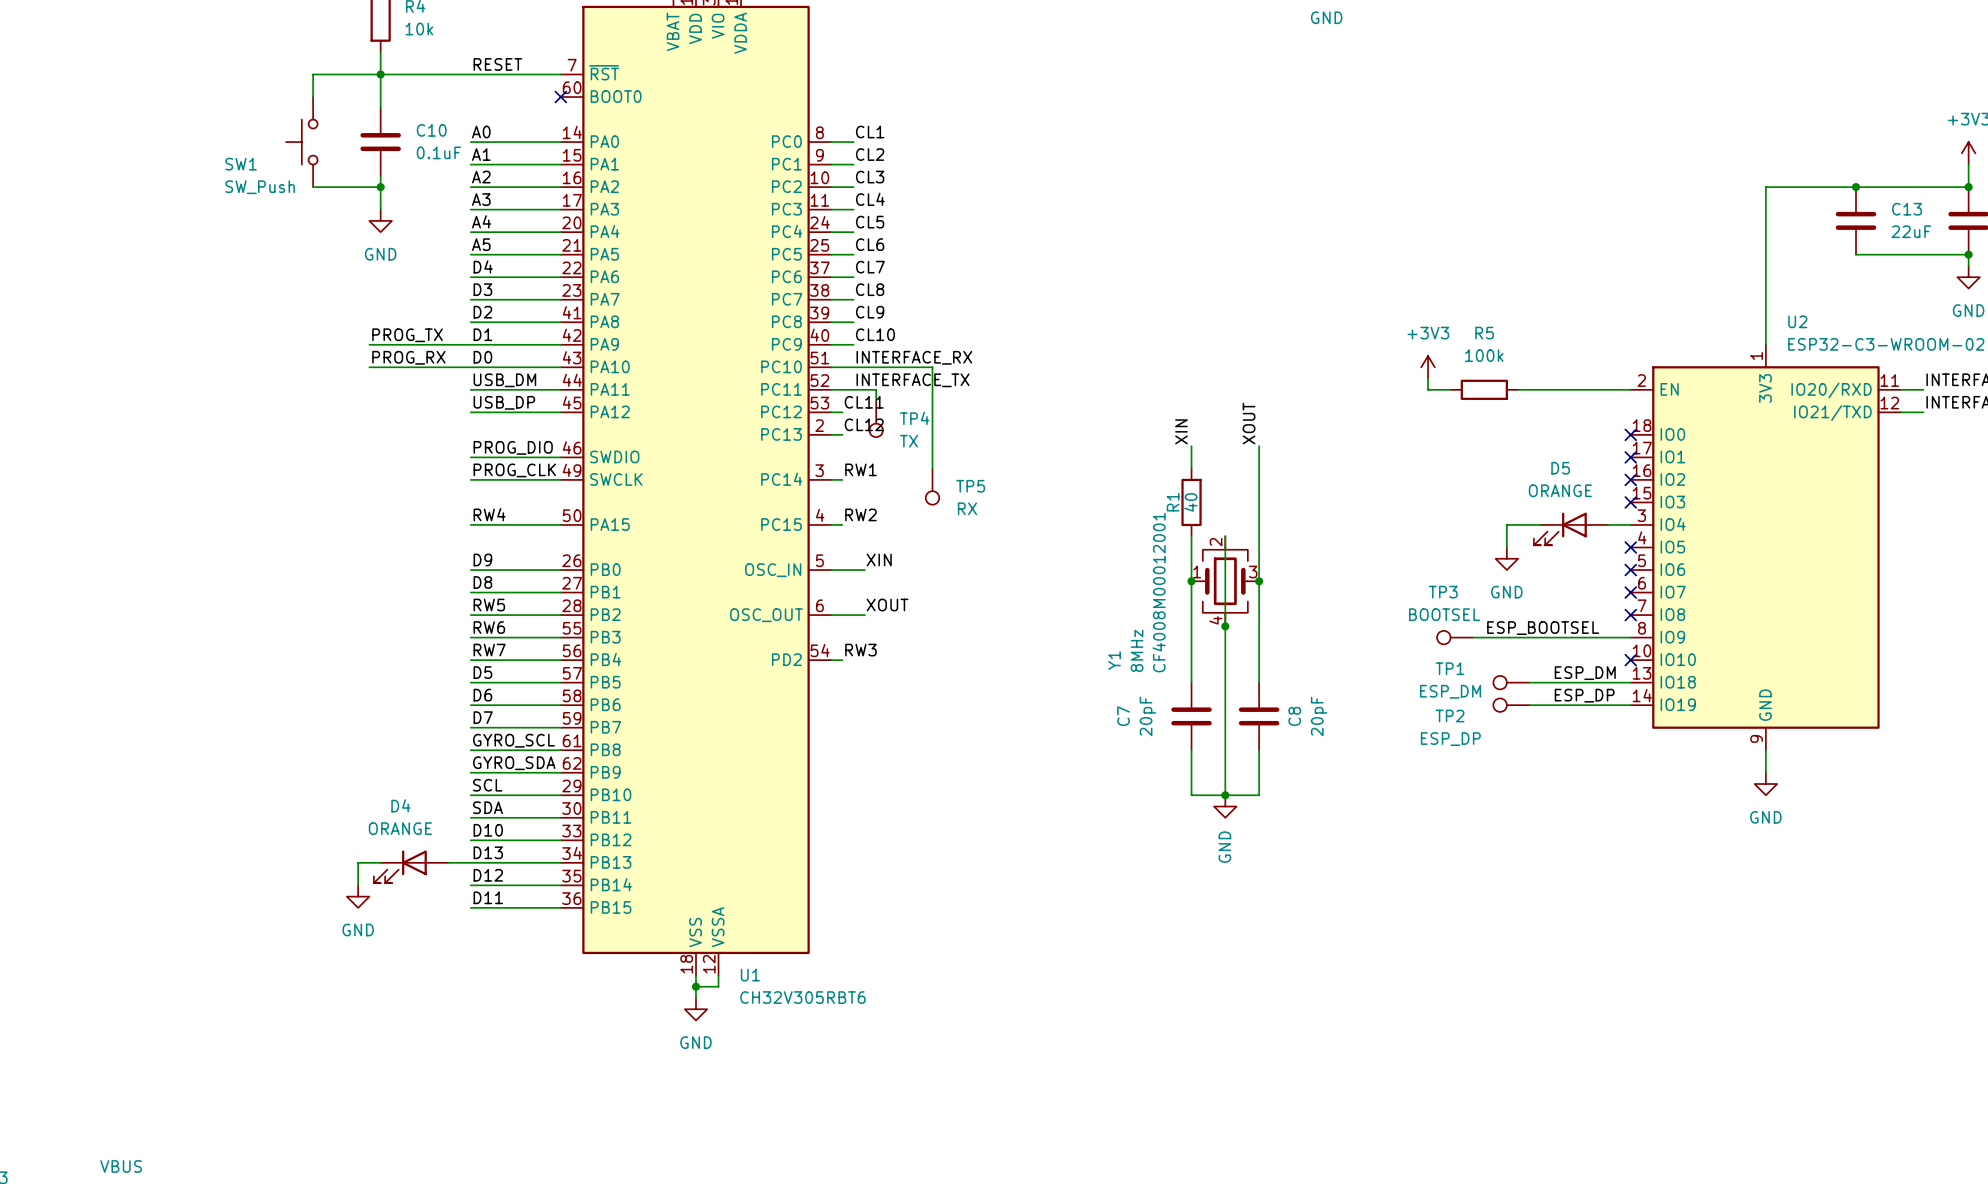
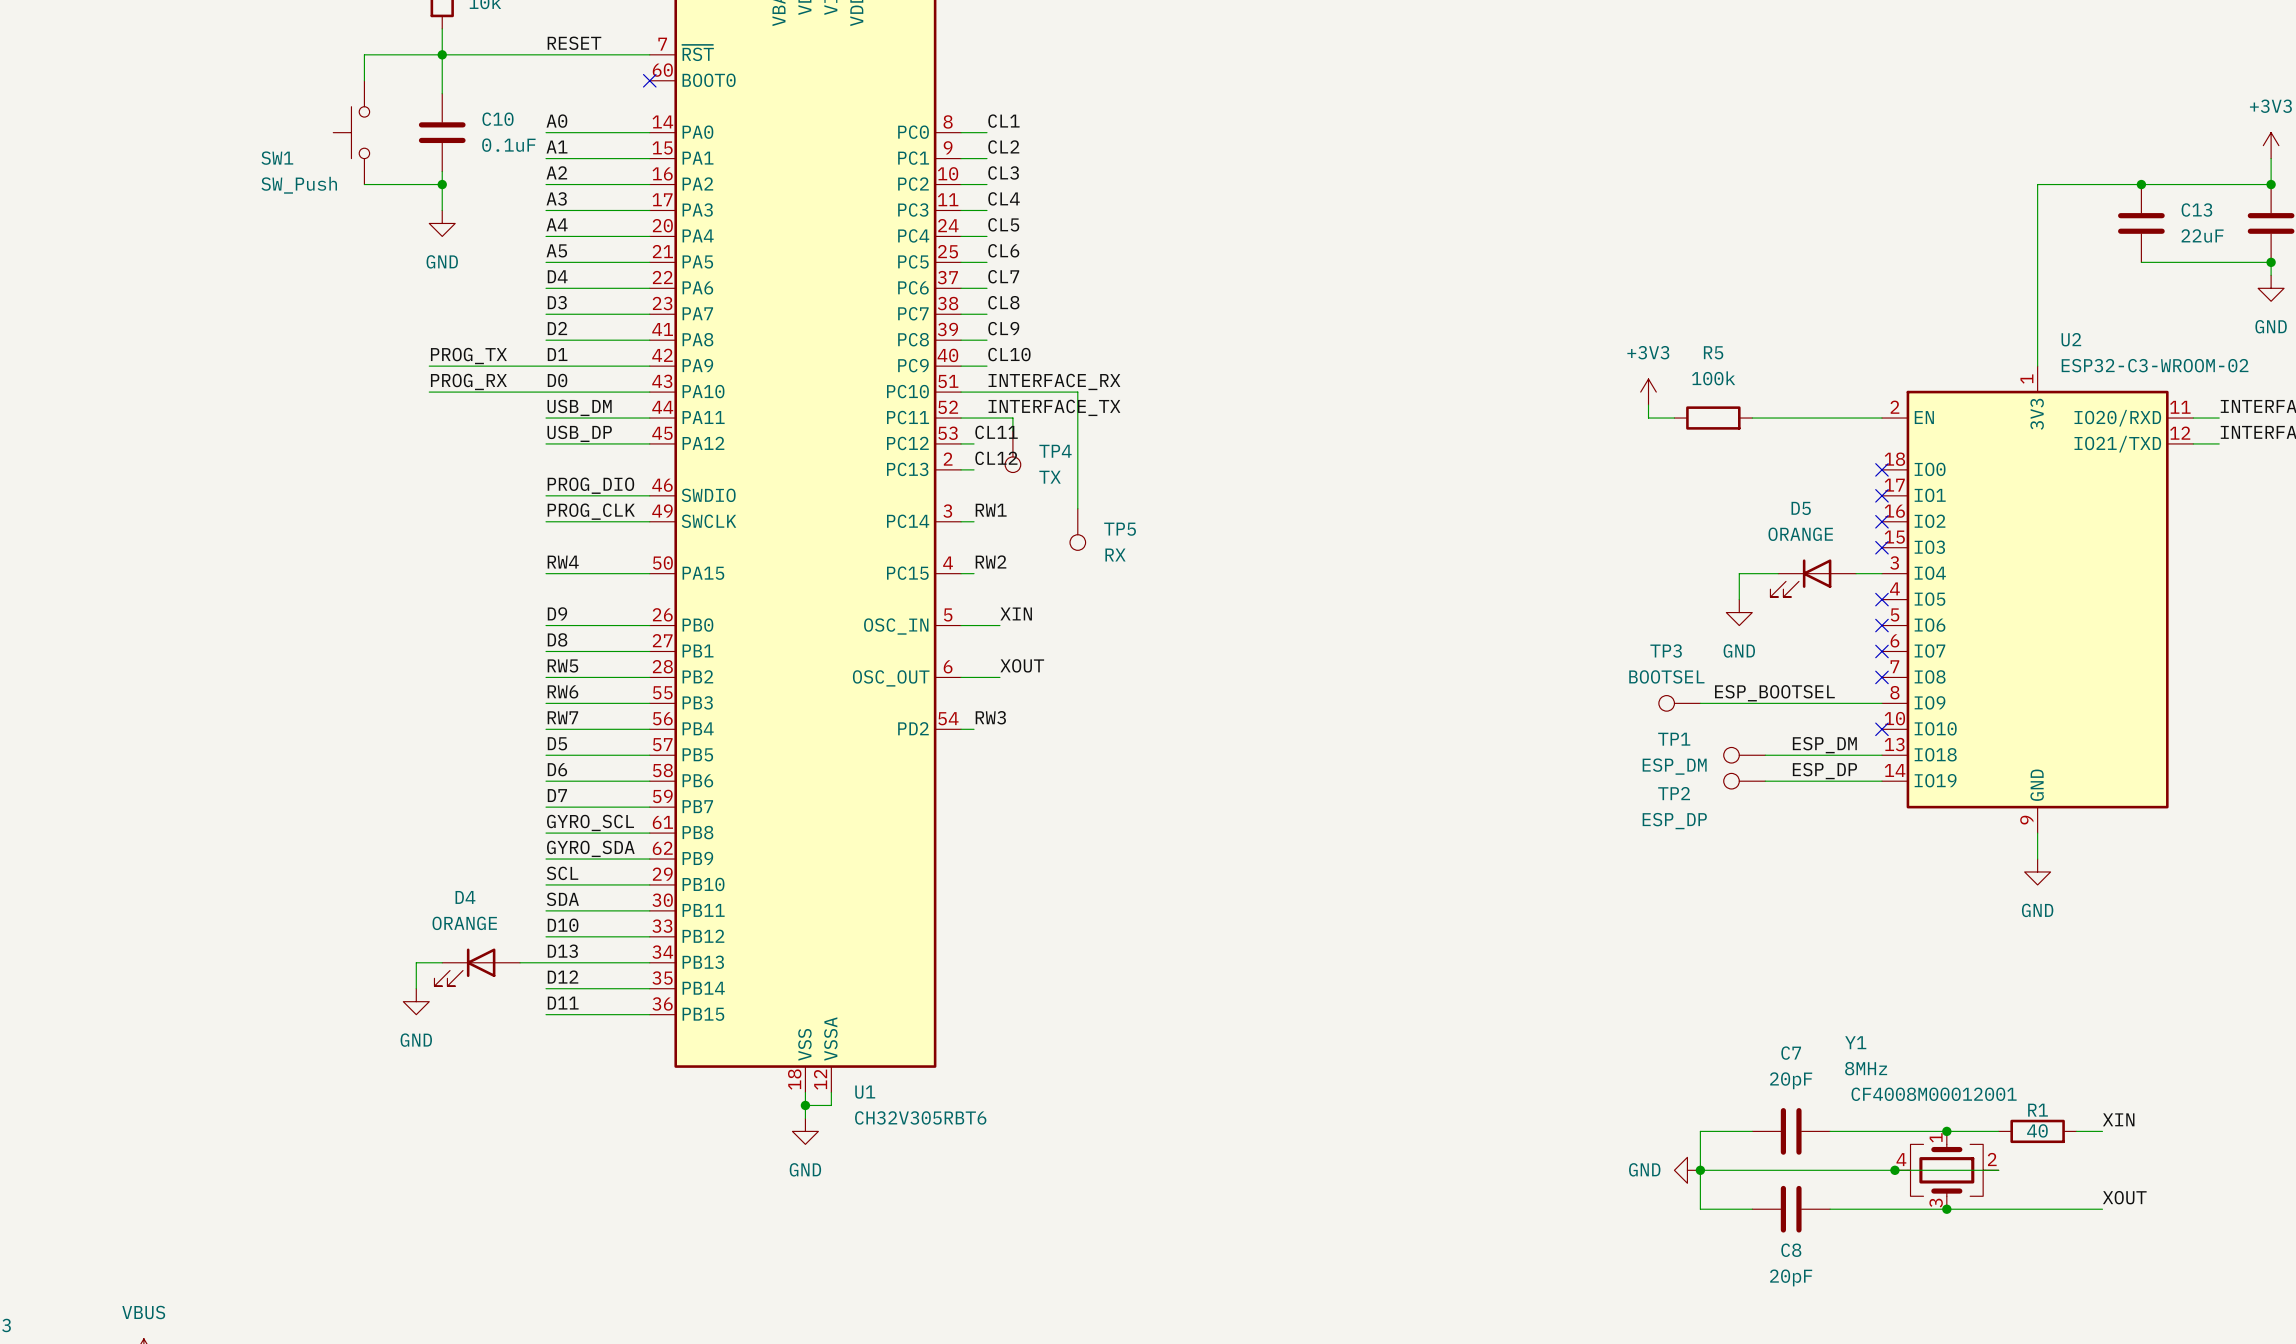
label: XOUT (1249, 423) -> none
label: XIN (1181, 431) -> none
wire: (1191, 446) (1191, 468) -> none
wire: (1259, 446) (1259, 682) -> none
R1 rotation: 0° (1191, 502) -> 90° clockwise (2037, 1131)
R1 position: (1191, 502) -> (2037, 1131)
wire: (1191, 536) (1191, 682) -> none
wire: (1225, 536) (1225, 795) -> none
junction: (1191, 581) -> none
Y1 rotation: 0° (1225, 581) -> 90° clockwise (1946, 1170)
Y1 position: (1225, 581) -> (1946, 1170)
junction: (1259, 581) -> none
junction: (1225, 626) -> none
C7 rotation: 0° (1191, 716) -> 90° clockwise (1791, 1131)
C7 position: (1191, 716) -> (1791, 1131)
C8 rotation: 0° (1259, 716) -> 90° clockwise (1791, 1209)
C8 position: (1259, 716) -> (1791, 1209)
wire: (1191, 750) (1191, 795) (1259, 795) (1259, 750) -> none
junction: (1225, 795) -> none
power symbol: GND (1225, 806) -> none
label: none -> XIN (2118, 1119)
wire: none -> (1752, 1131) (1700, 1131) (1700, 1209) (1752, 1209)
wire: none -> (1830, 1131) (1998, 1131)
junction: none -> (1946, 1131)
wire: none -> (2076, 1131) (2102, 1131)
power symbol: none -> GND (1687, 1170)
wire: none -> (1700, 1170) (1998, 1170)
junction: none -> (1700, 1170)
junction: none -> (1894, 1170)
label: none -> XOUT (2124, 1197)
wire: none -> (1830, 1209) (2102, 1209)
junction: none -> (1946, 1209)

